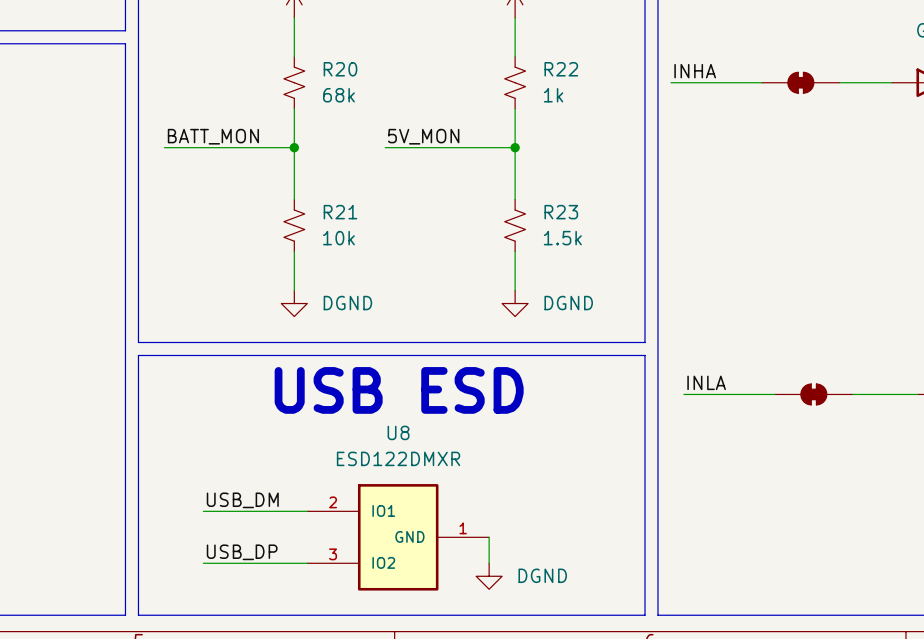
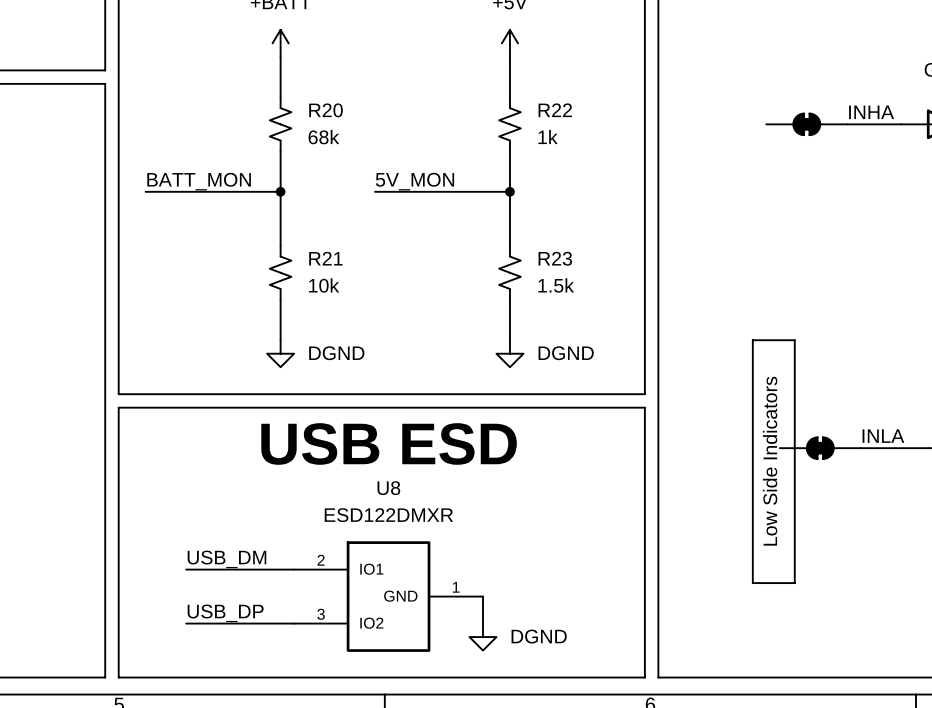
label position: INHA (695, 71) -> INHA (871, 112)
wire: (670, 82) (761, 82) -> none
line: none -> (752, 340) (794, 340) (794, 583) (752, 583) (752, 340)
label position: INLA (706, 382) -> INLA (883, 436)
wire: (683, 394) (774, 394) -> none
text: none -> Low Side Indicators (770, 461)

